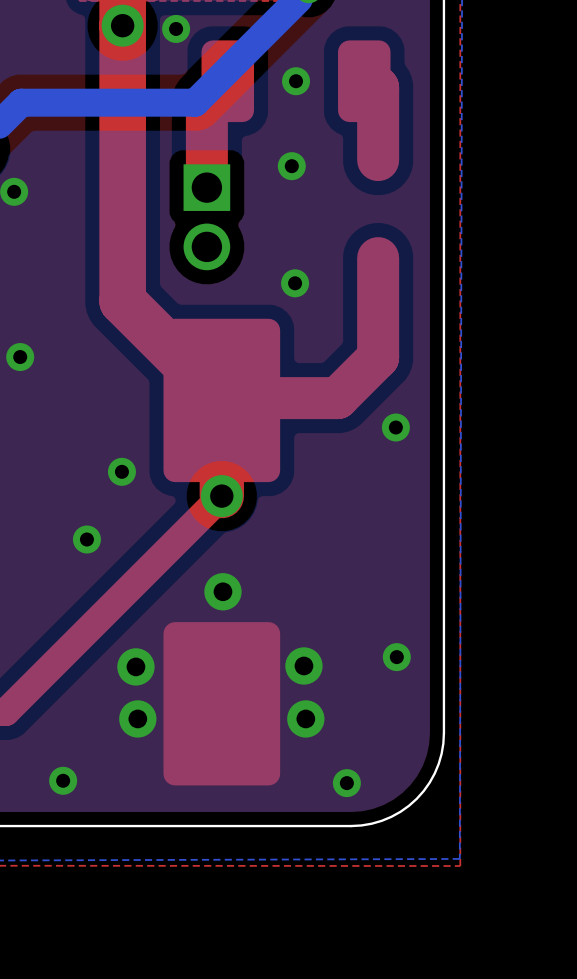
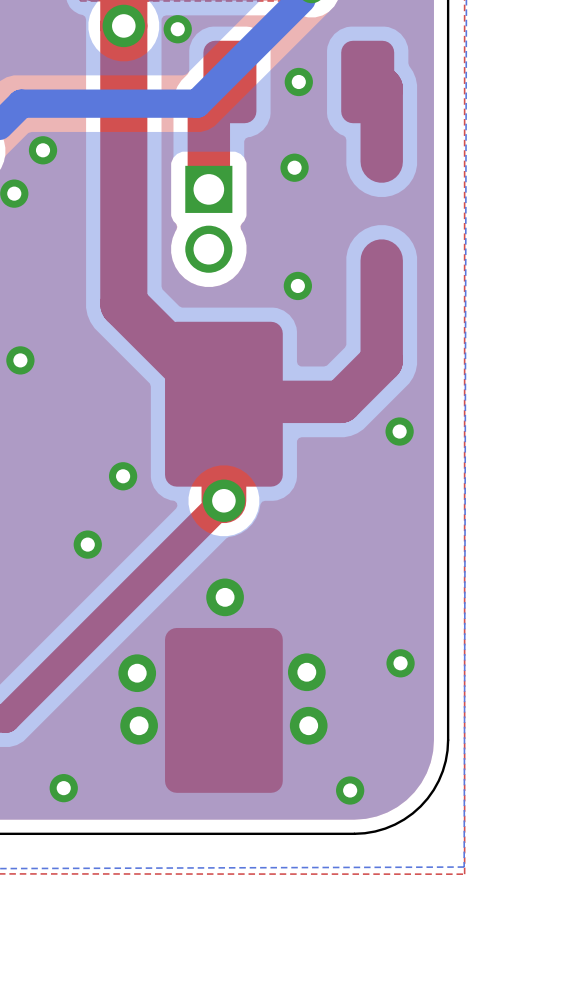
via: none -> (43, 150)

